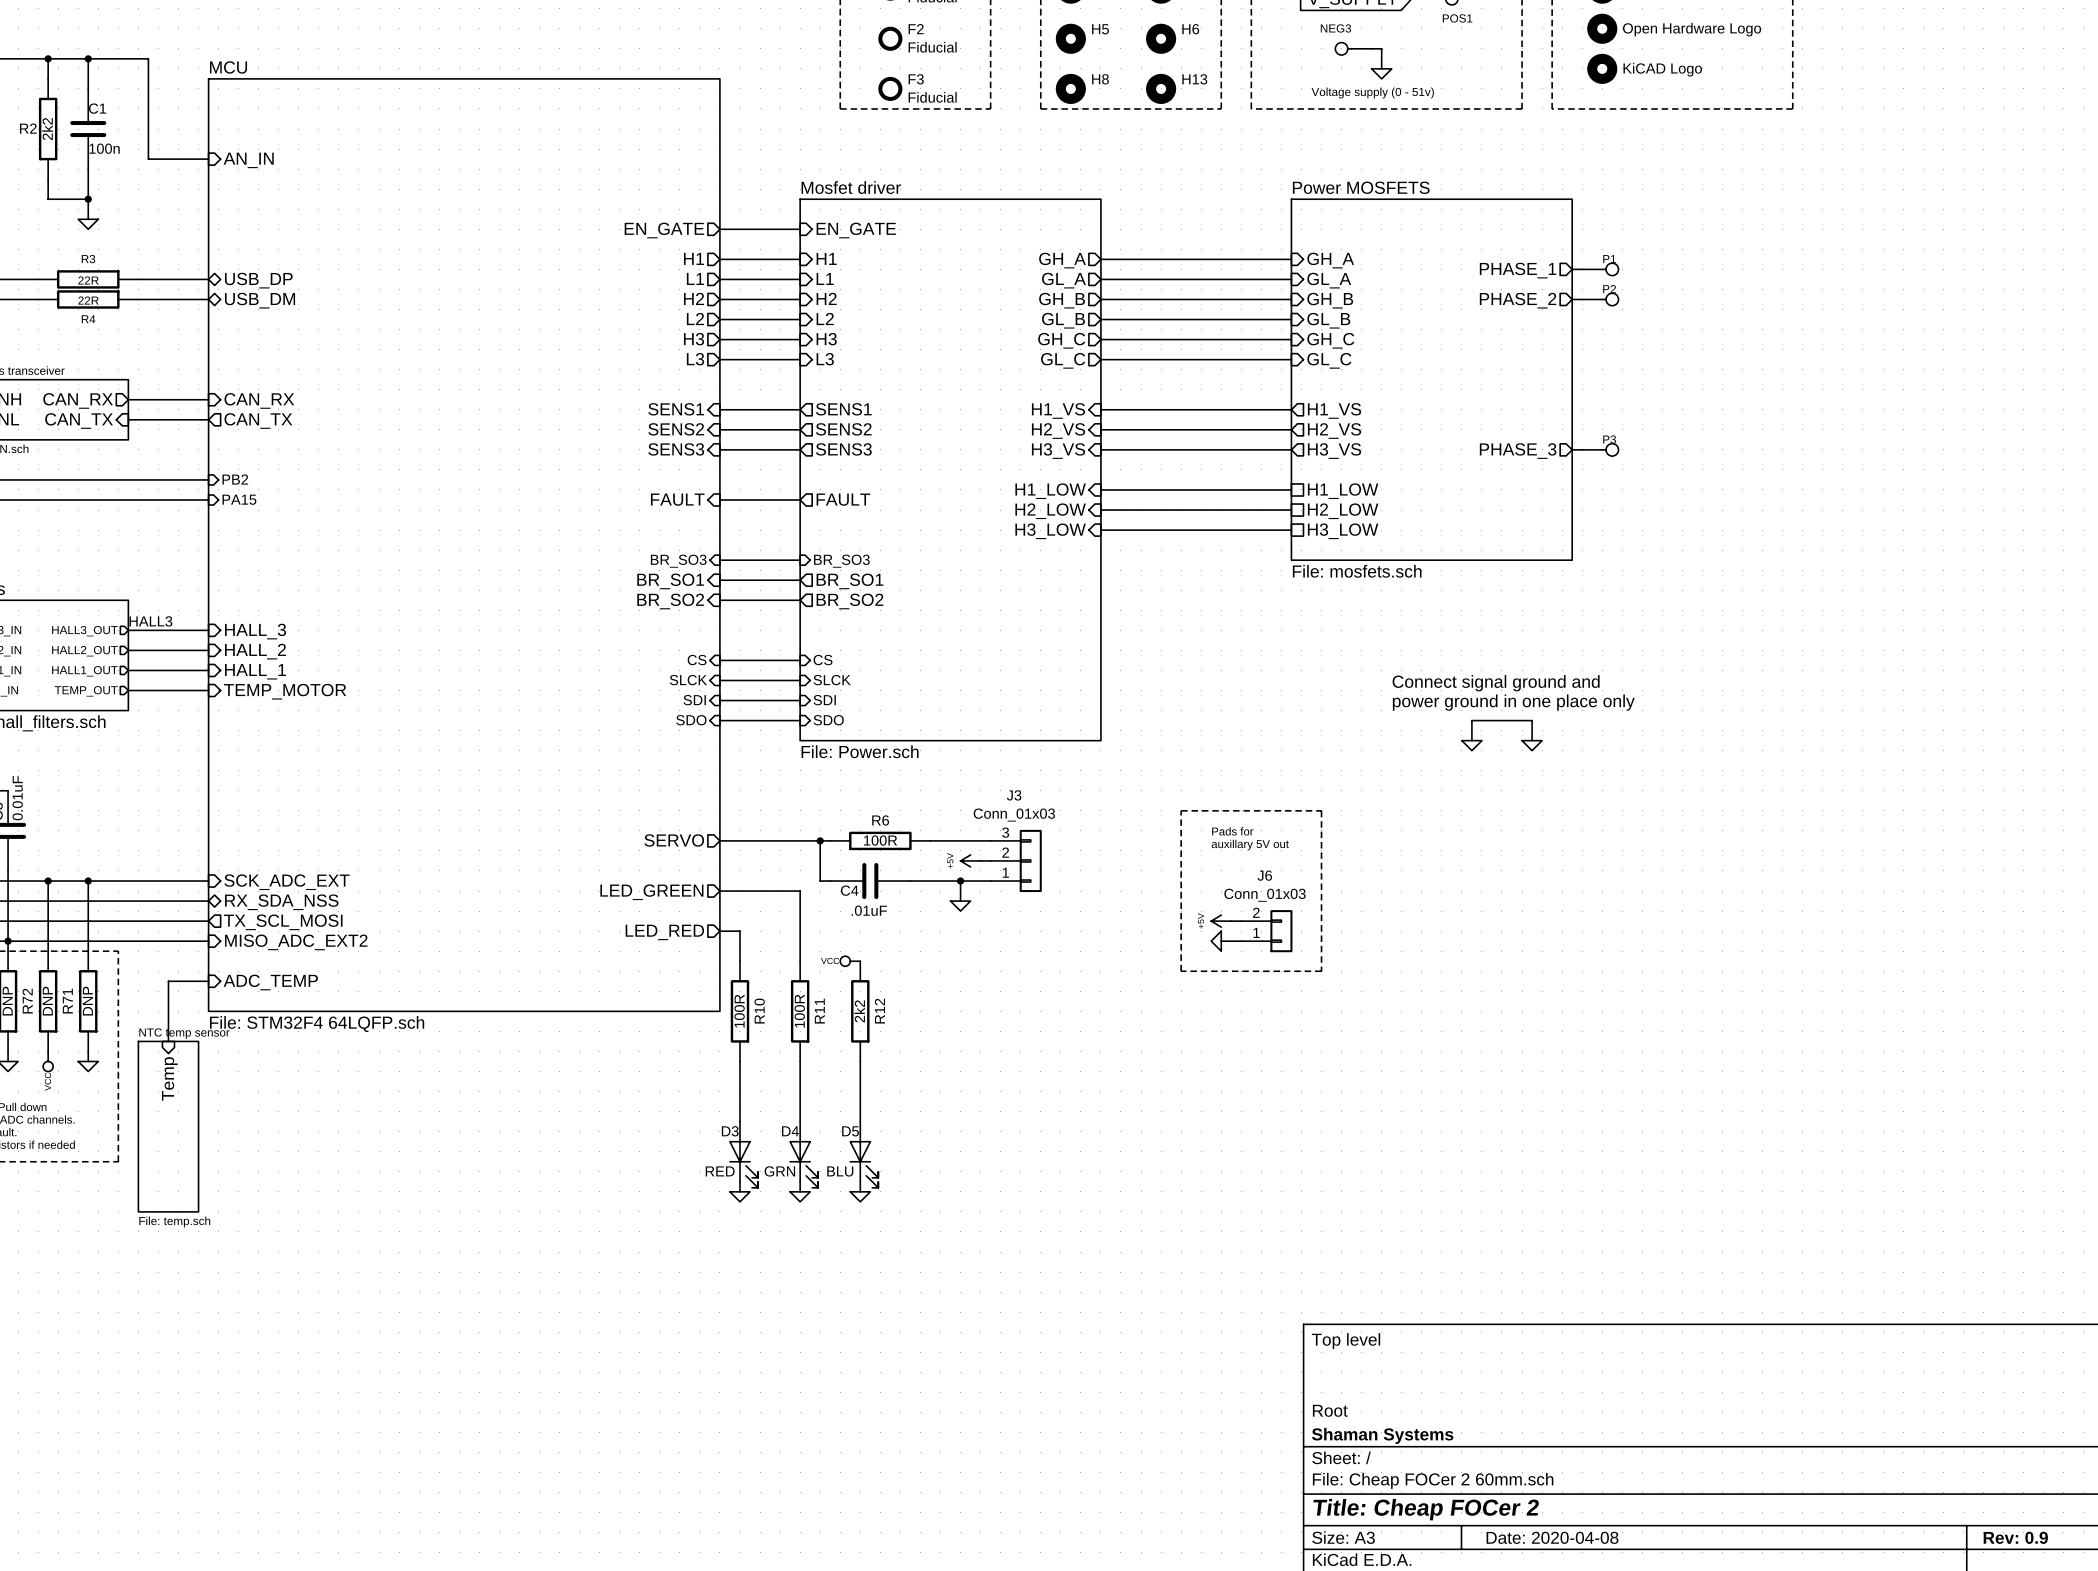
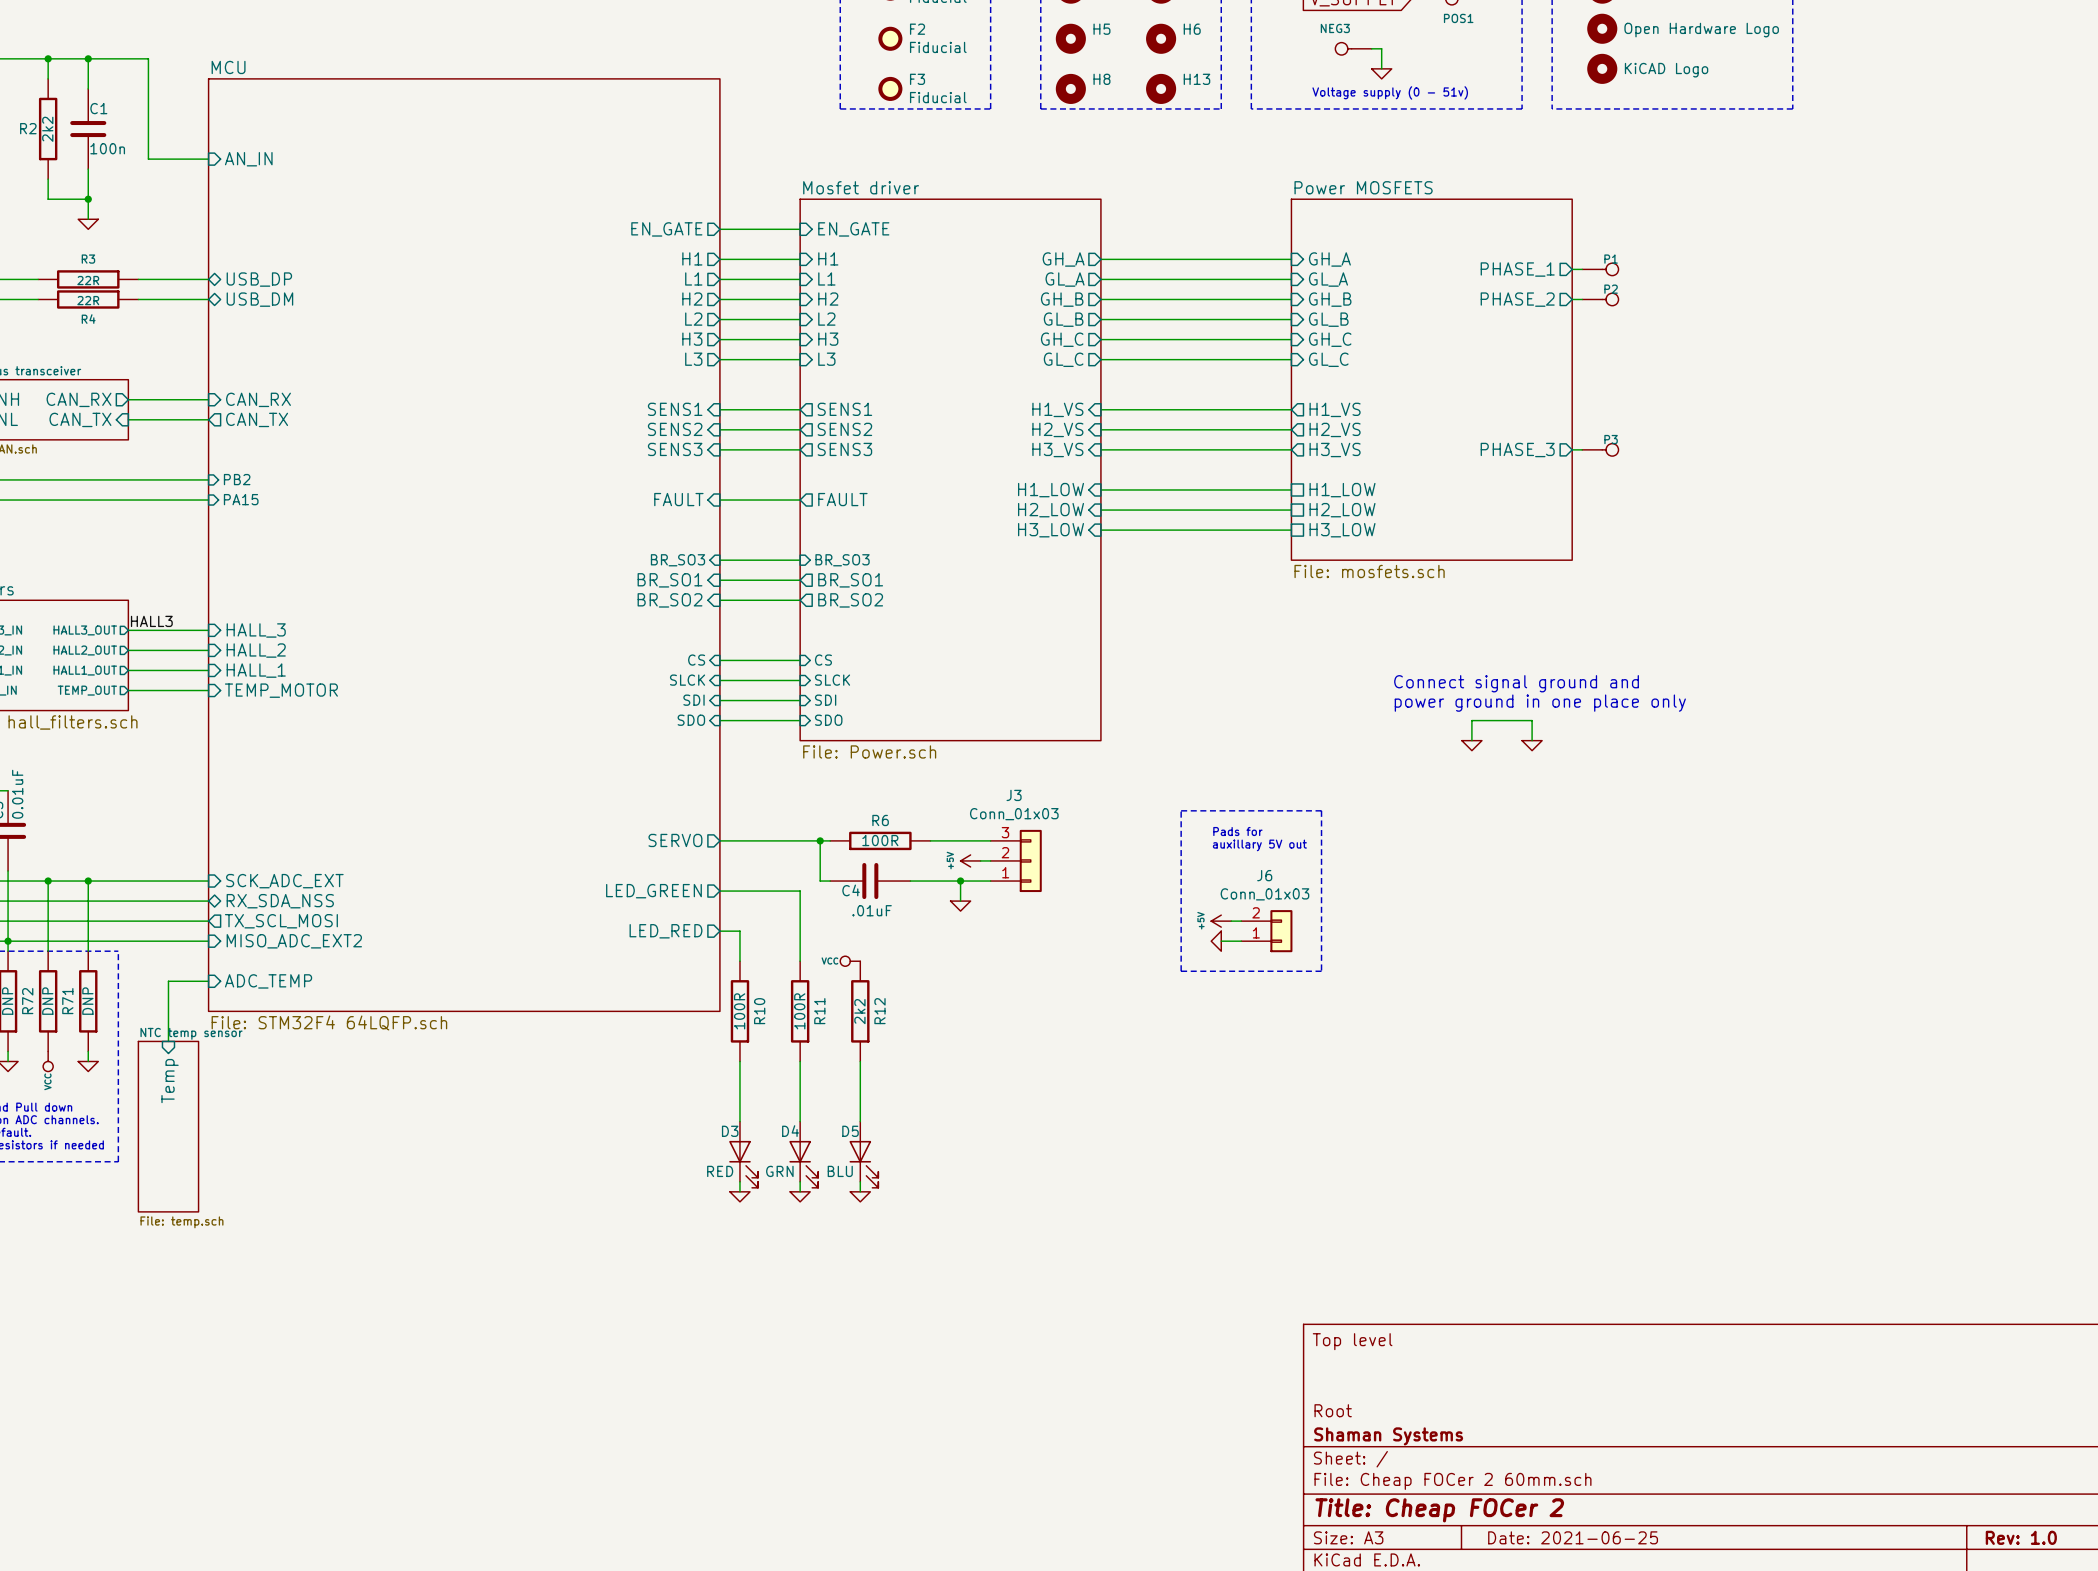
title block: Date: 2020-04-08 (1552, 1537) -> Date: 2021-06-25 (1573, 1537)
title block: Rev: 0.9 (2015, 1537) -> Rev: 1.0 (2021, 1537)

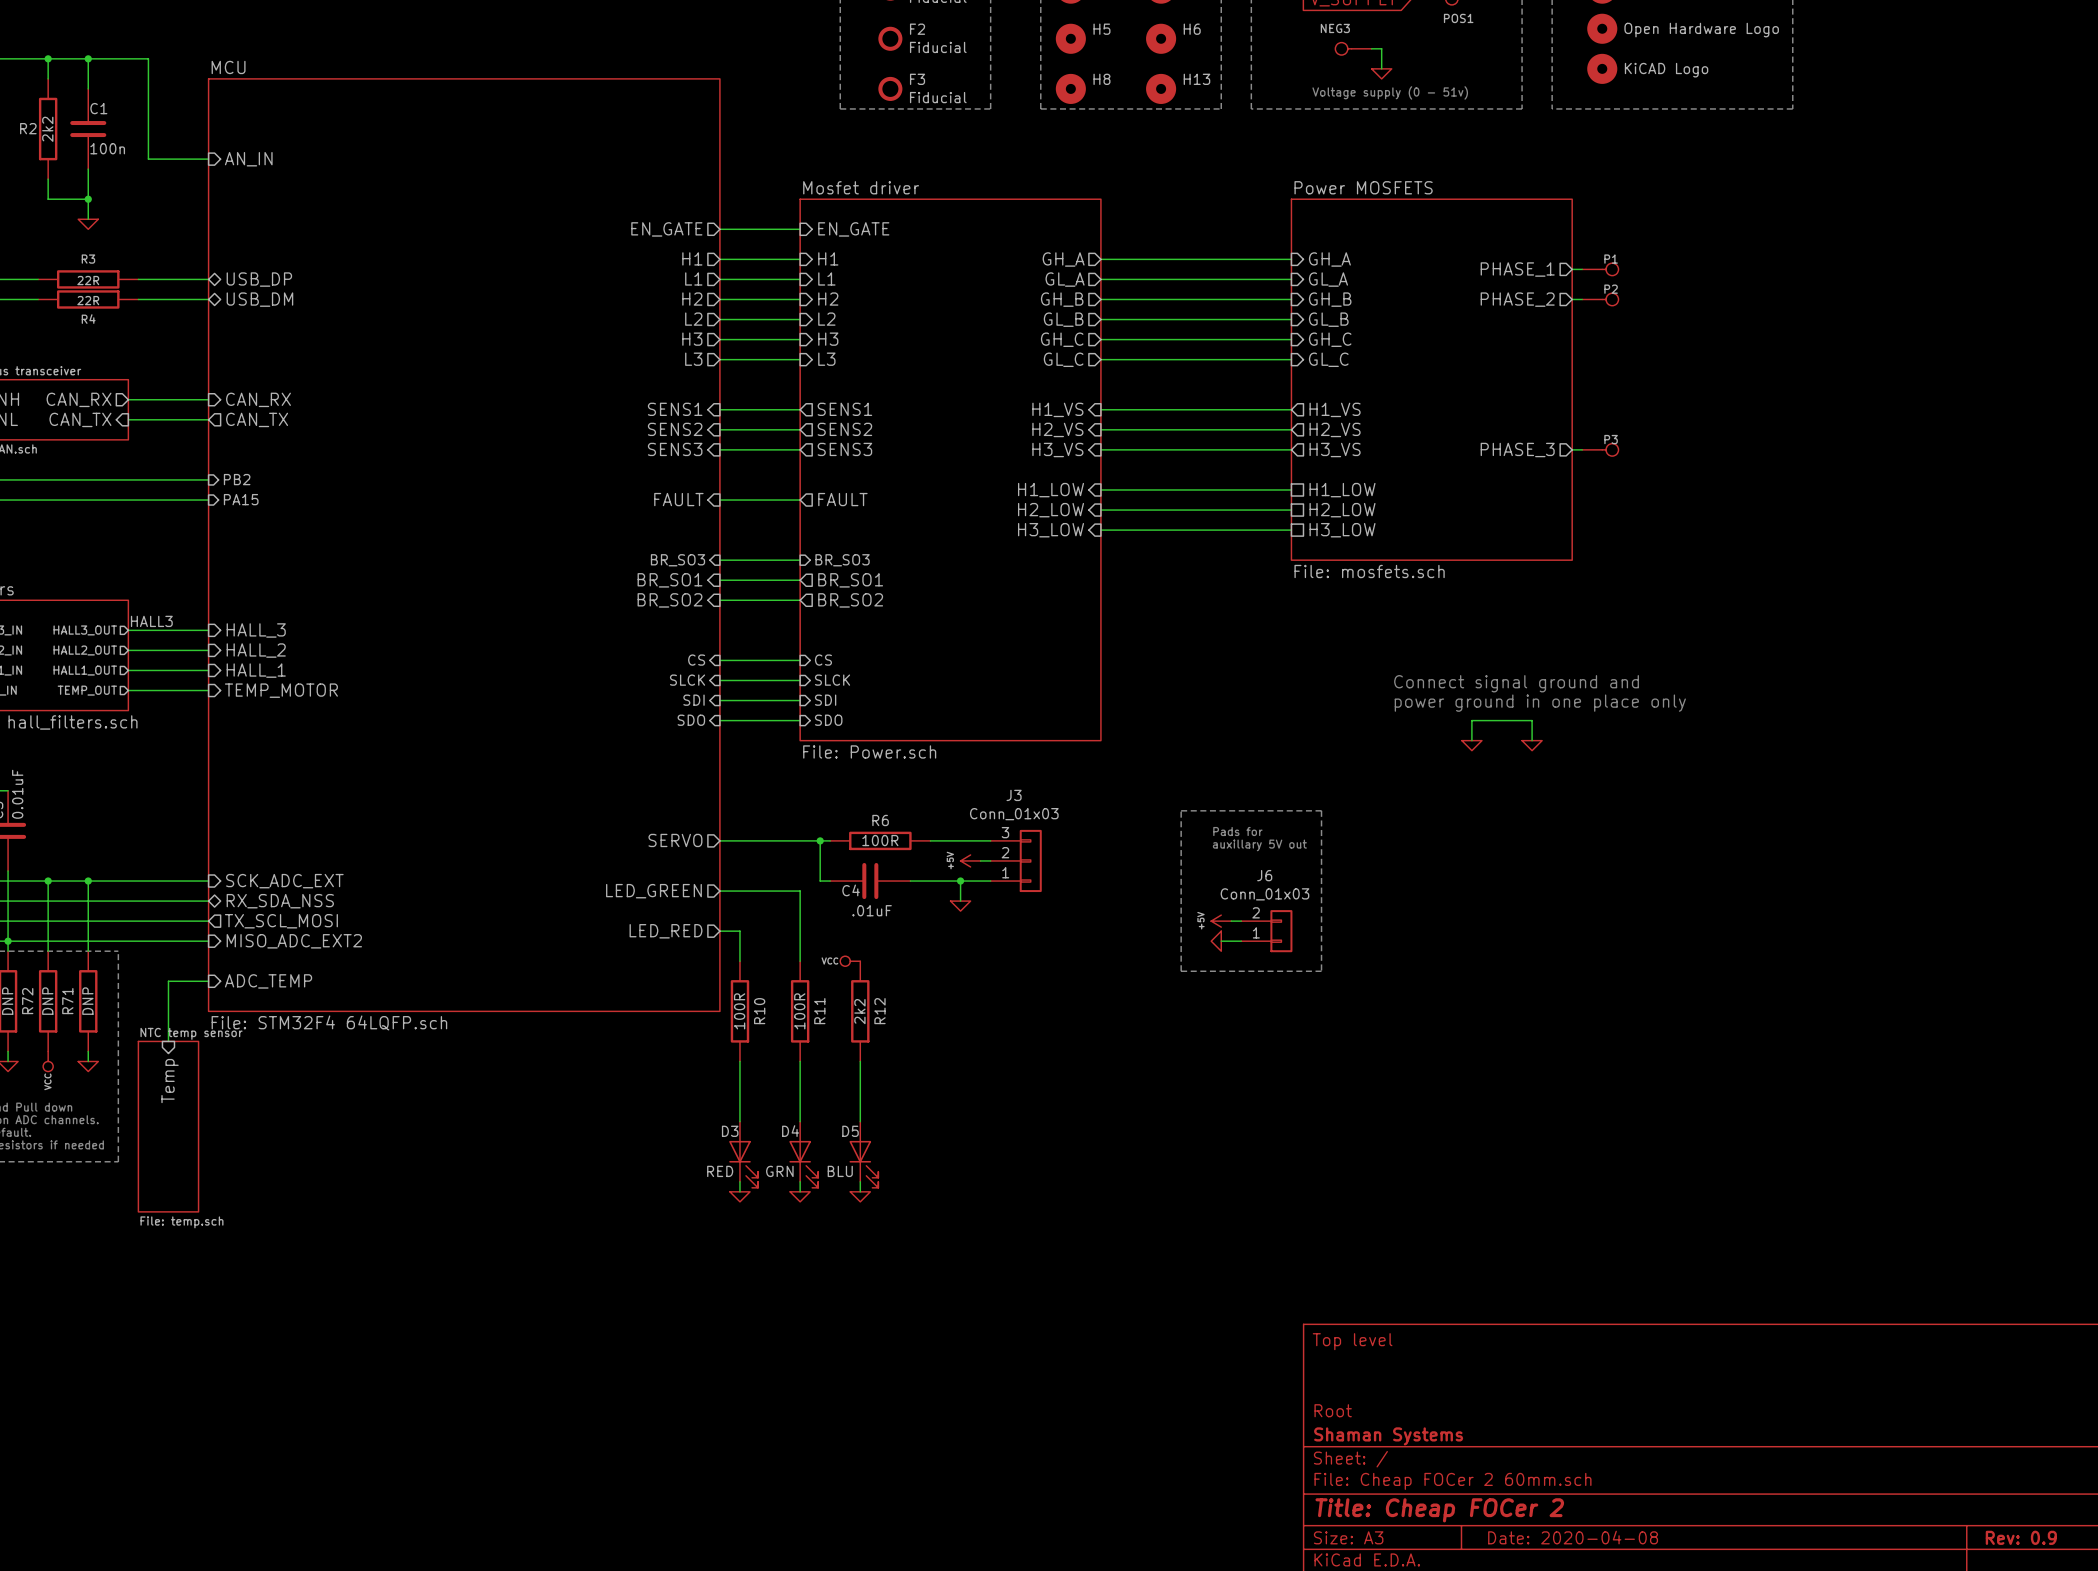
title block: Date: 2021-06-25 (1573, 1537) -> Date: 2020-04-08 (1573, 1537)
title block: Rev: 1.0 (2021, 1537) -> Rev: 0.9 (2021, 1537)

